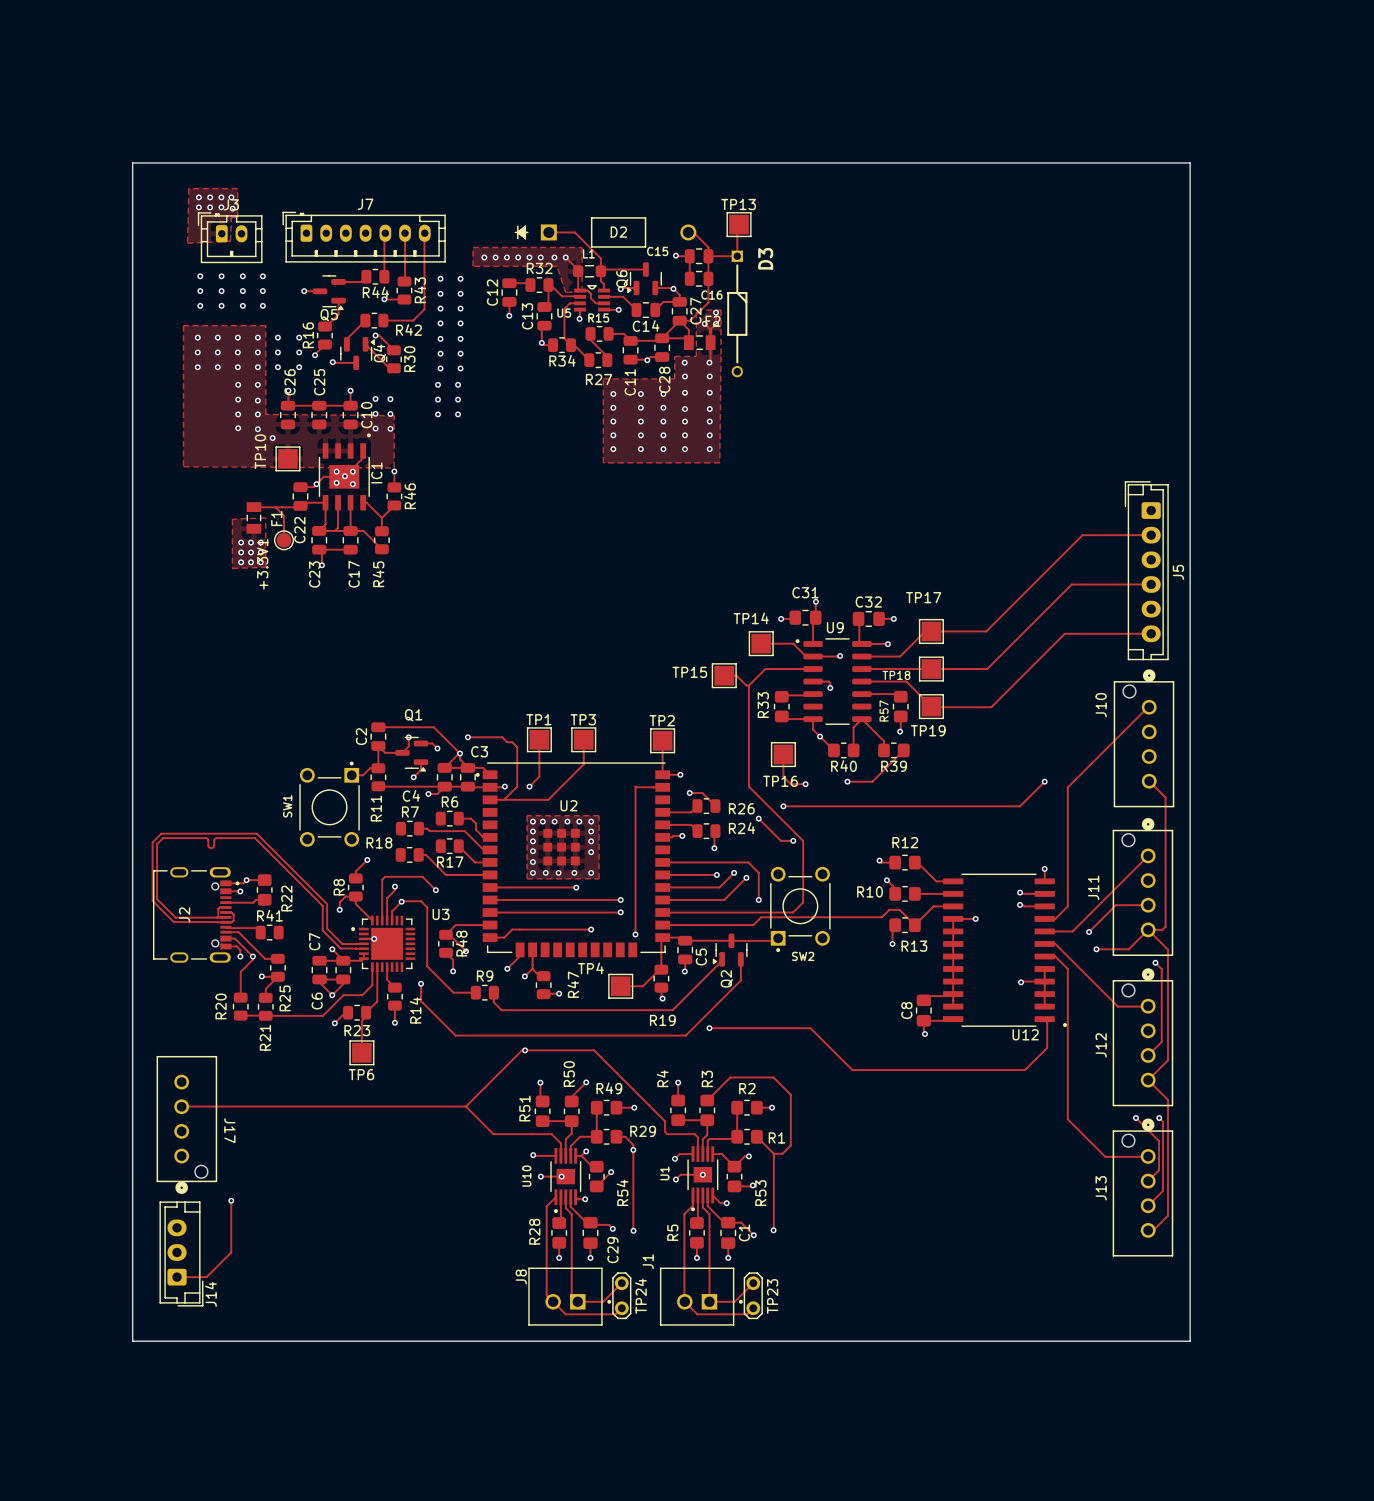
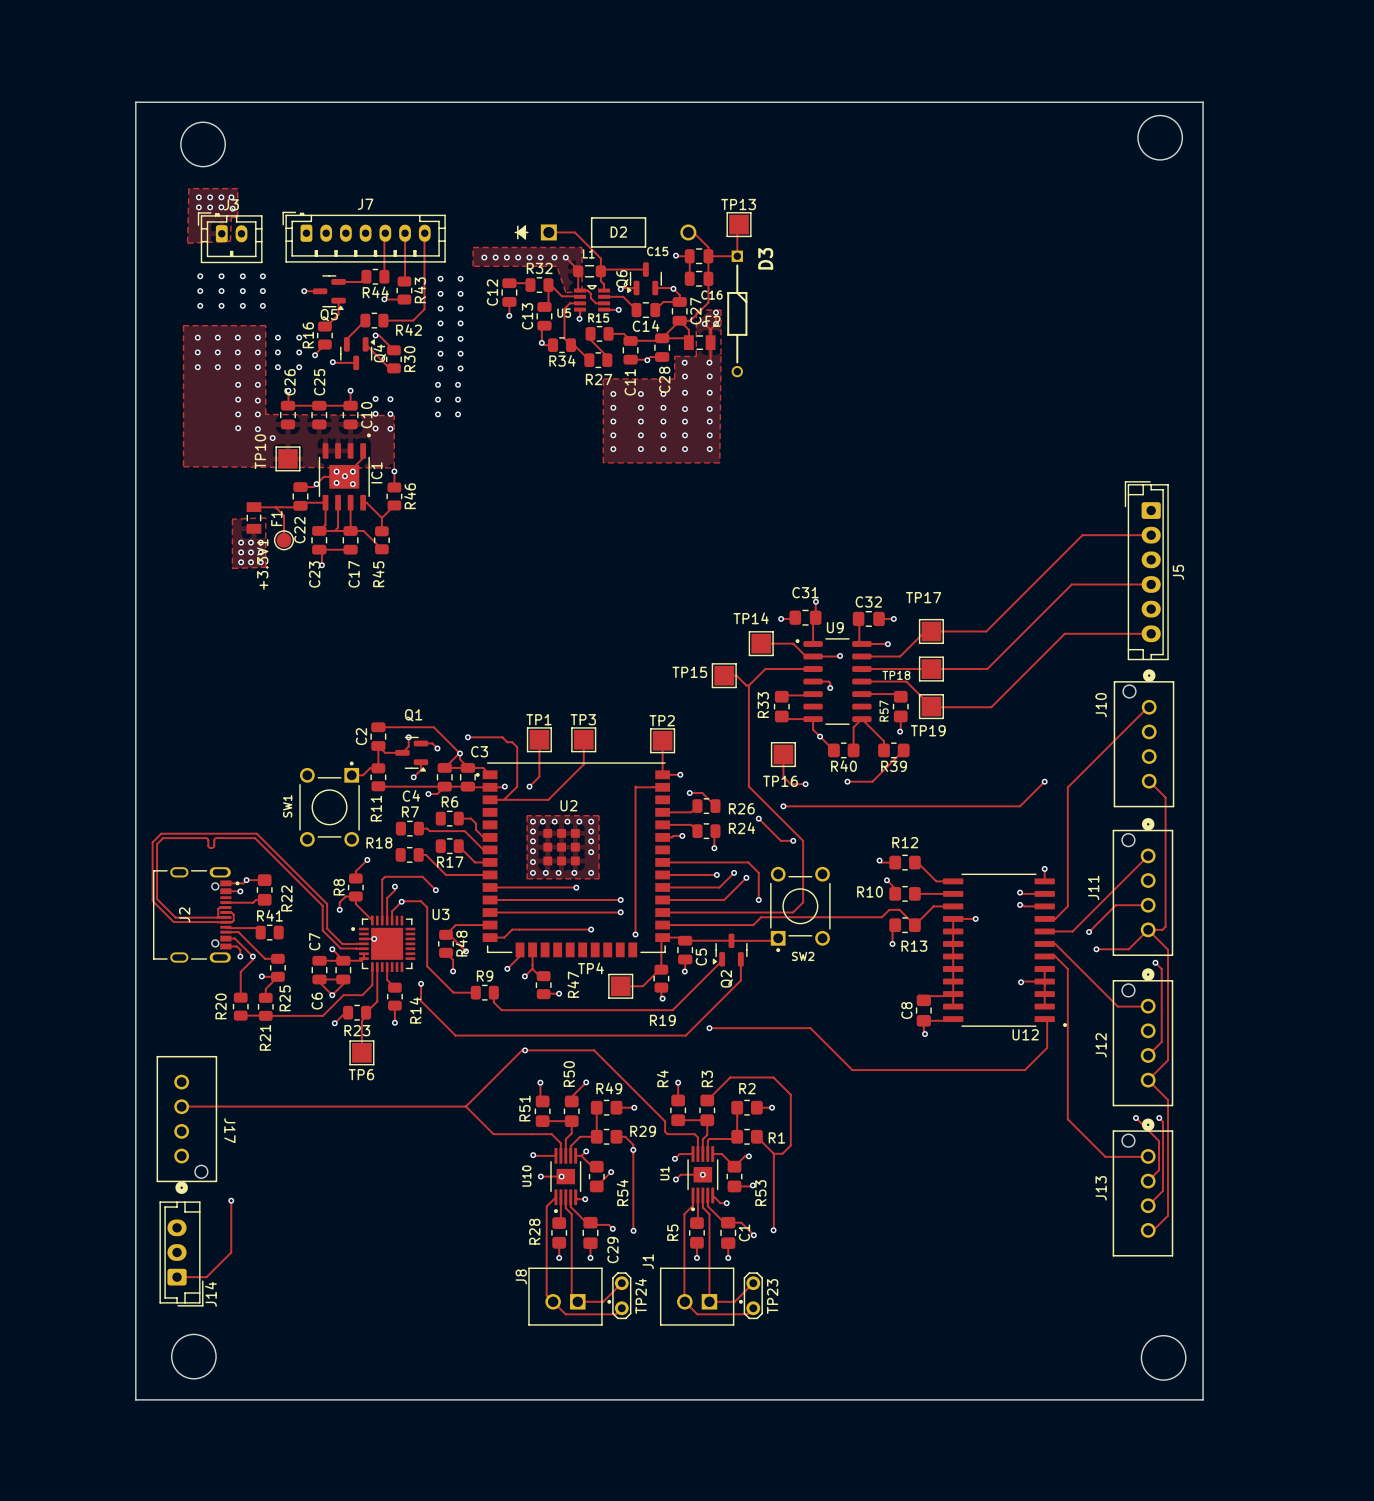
round board edge: none -> [1137, 115, 1183, 161]
round board edge: none -> [180, 122, 226, 167]
board edge: (132, 162) (1190, 162) (1190, 1341) (132, 1341) (132, 162) -> (135, 102) (135, 1399) (1203, 1399) (1203, 102) (135, 102)
round board edge: none -> [171, 1334, 217, 1380]
round board edge: none -> [1141, 1335, 1187, 1381]

